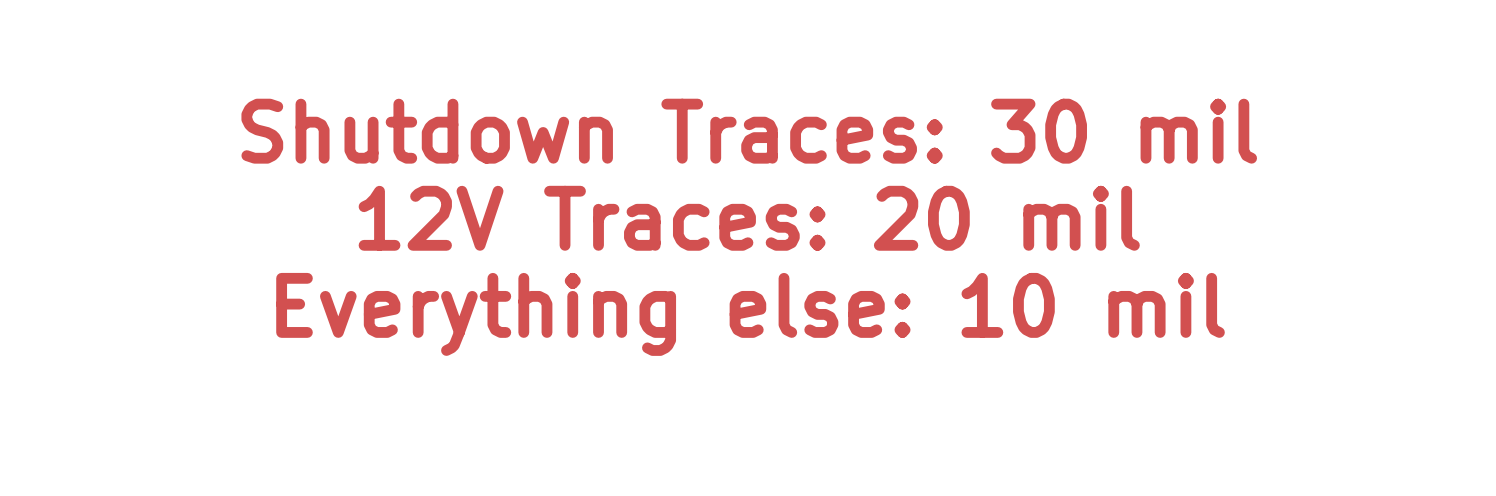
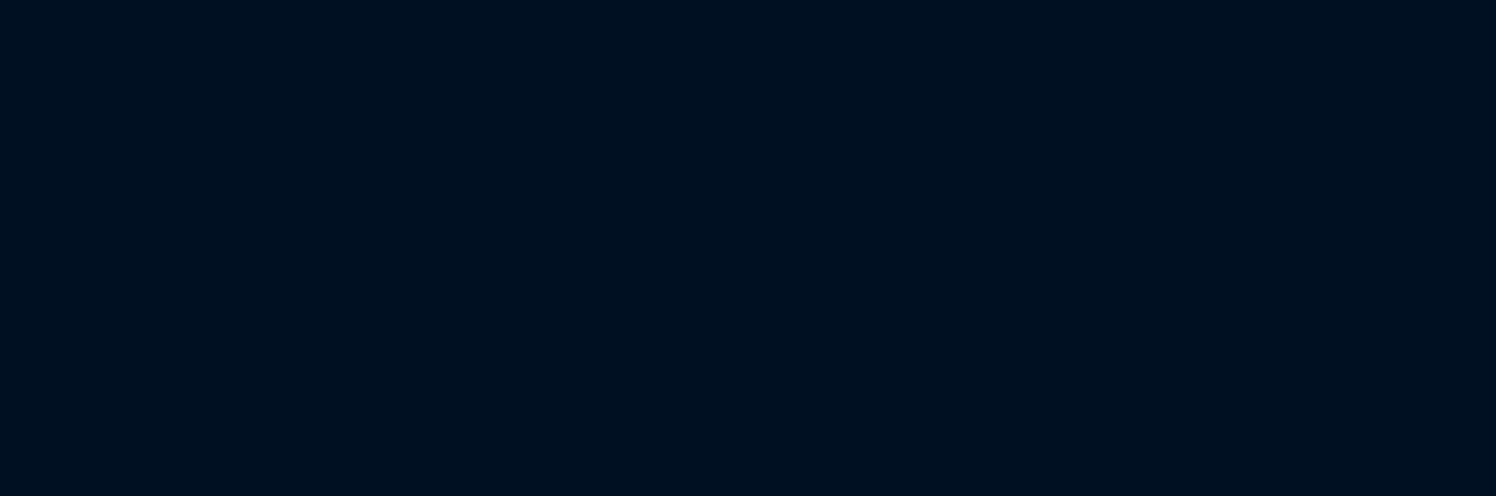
text: Shutdown Traces: 30 mil (749, 131) -> none
text: 12V Traces: 20 mil (749, 218) -> none
text: Everything else: 10 mil (750, 314) -> none

